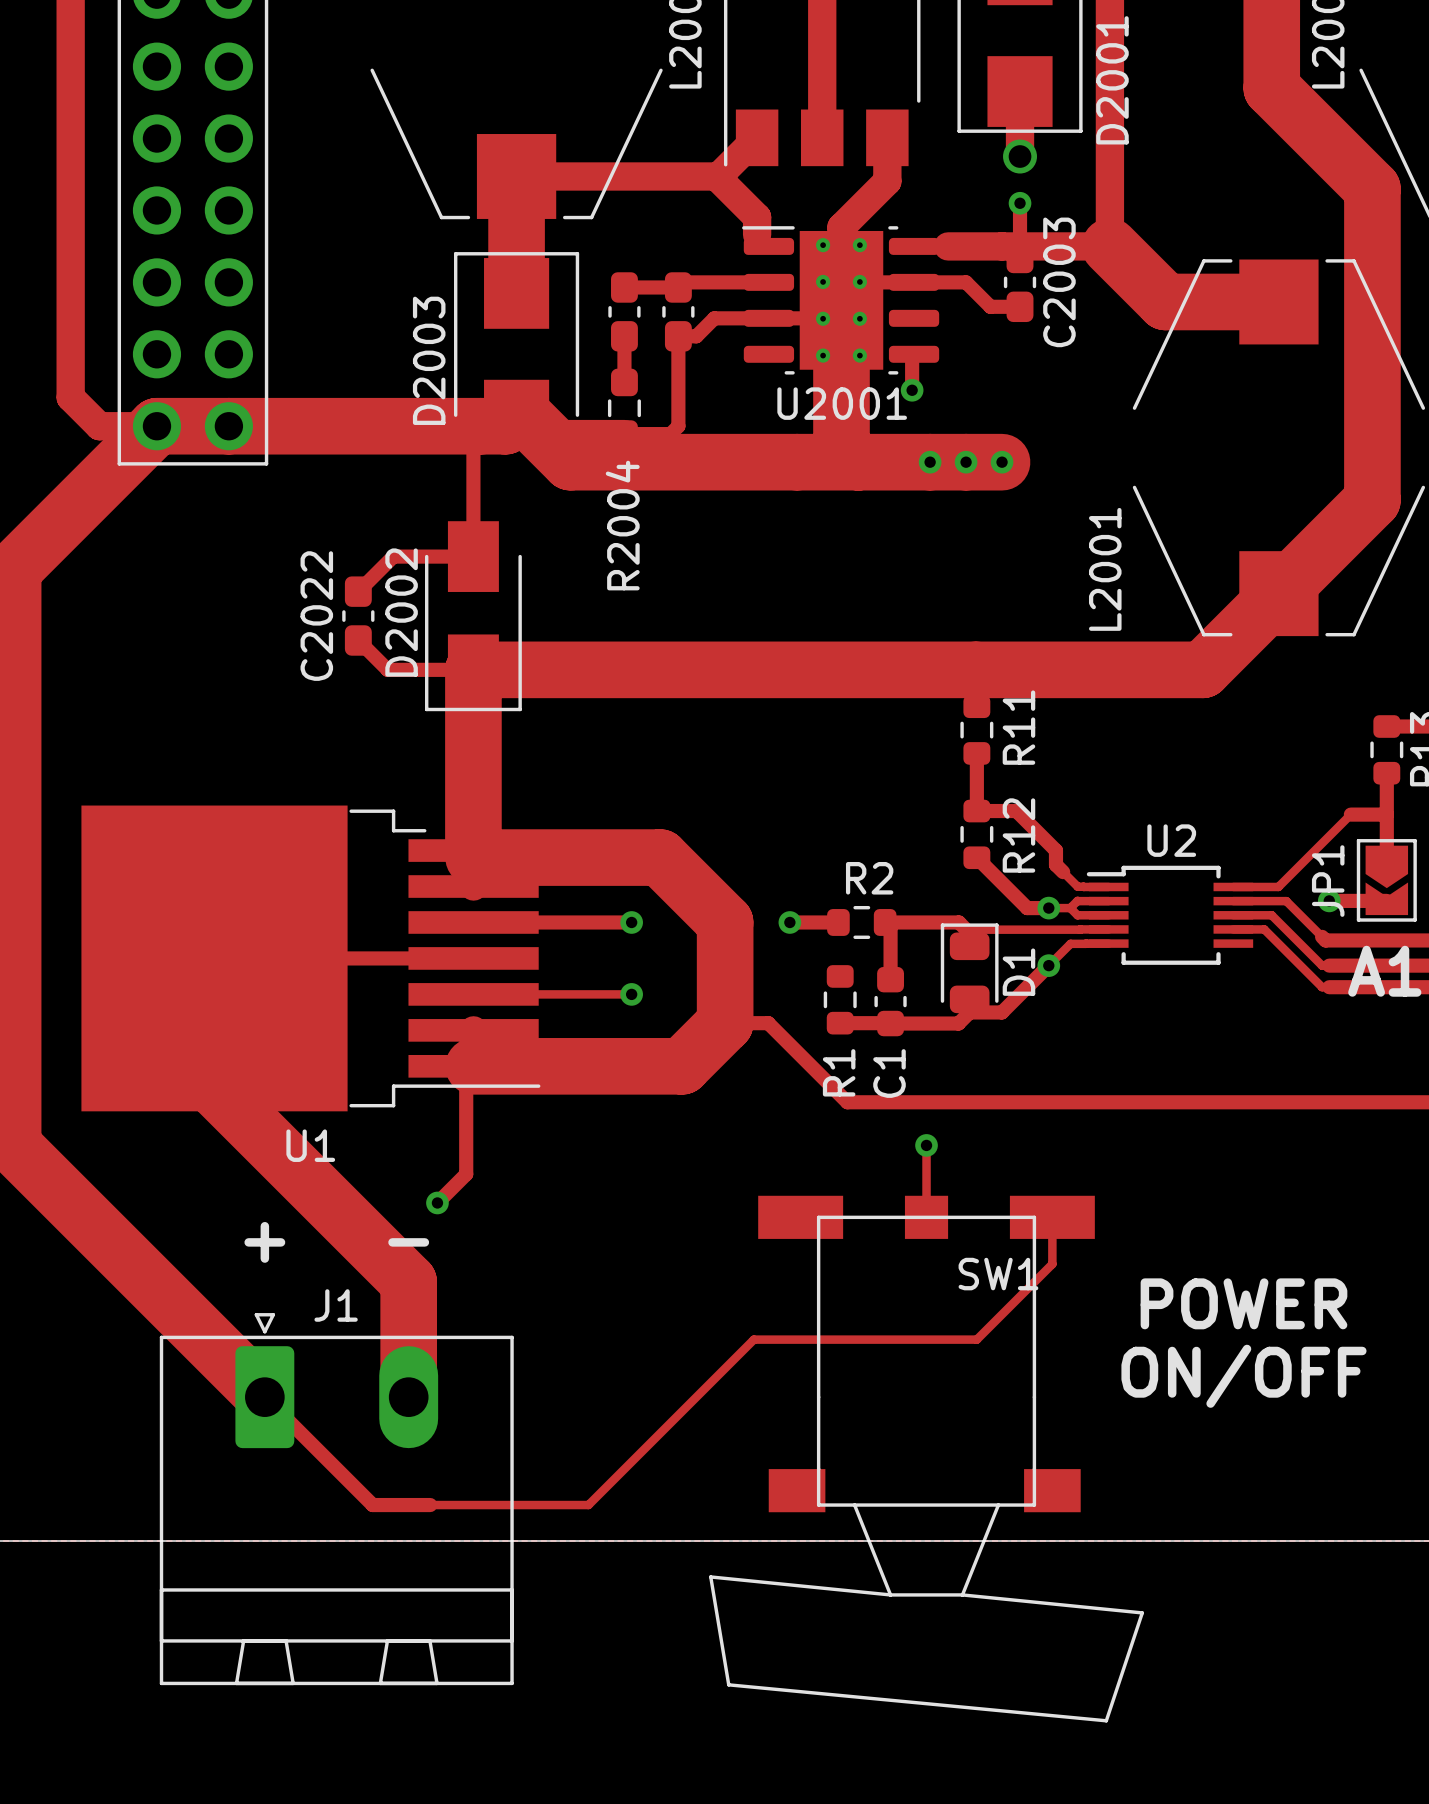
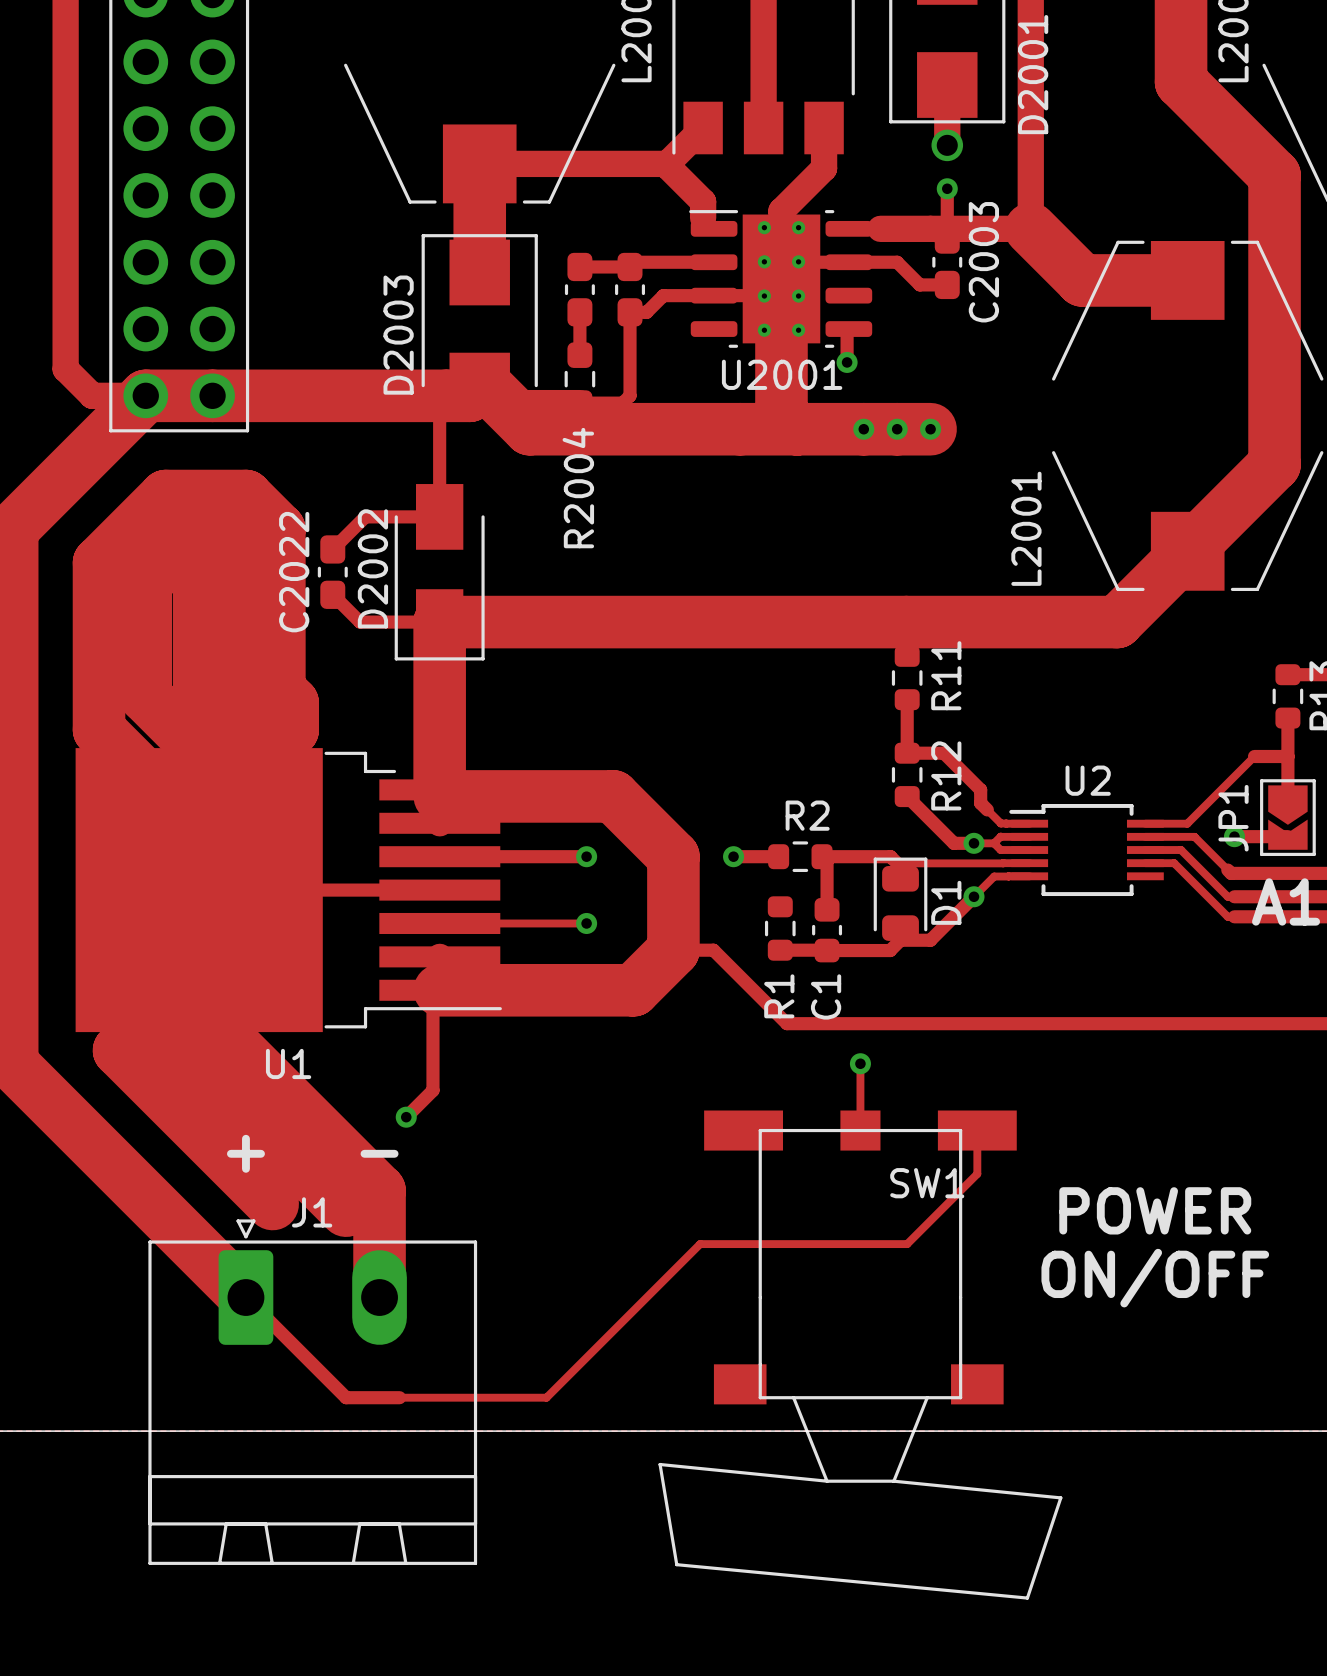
track: none -> (199, 582) (199, 683) (205, 689) (205, 696) (245, 696) (245, 556) (232, 542) (185, 542) (145, 582) (145, 696) (185, 736) (286, 736) (292, 729) (292, 703) (279, 689) (279, 529) (245, 496) (165, 496) (99, 562) (99, 729) (199, 829) (199, 890)
track: none -> (272, 1204) (119, 1050) (185, 1050) (346, 1210)

